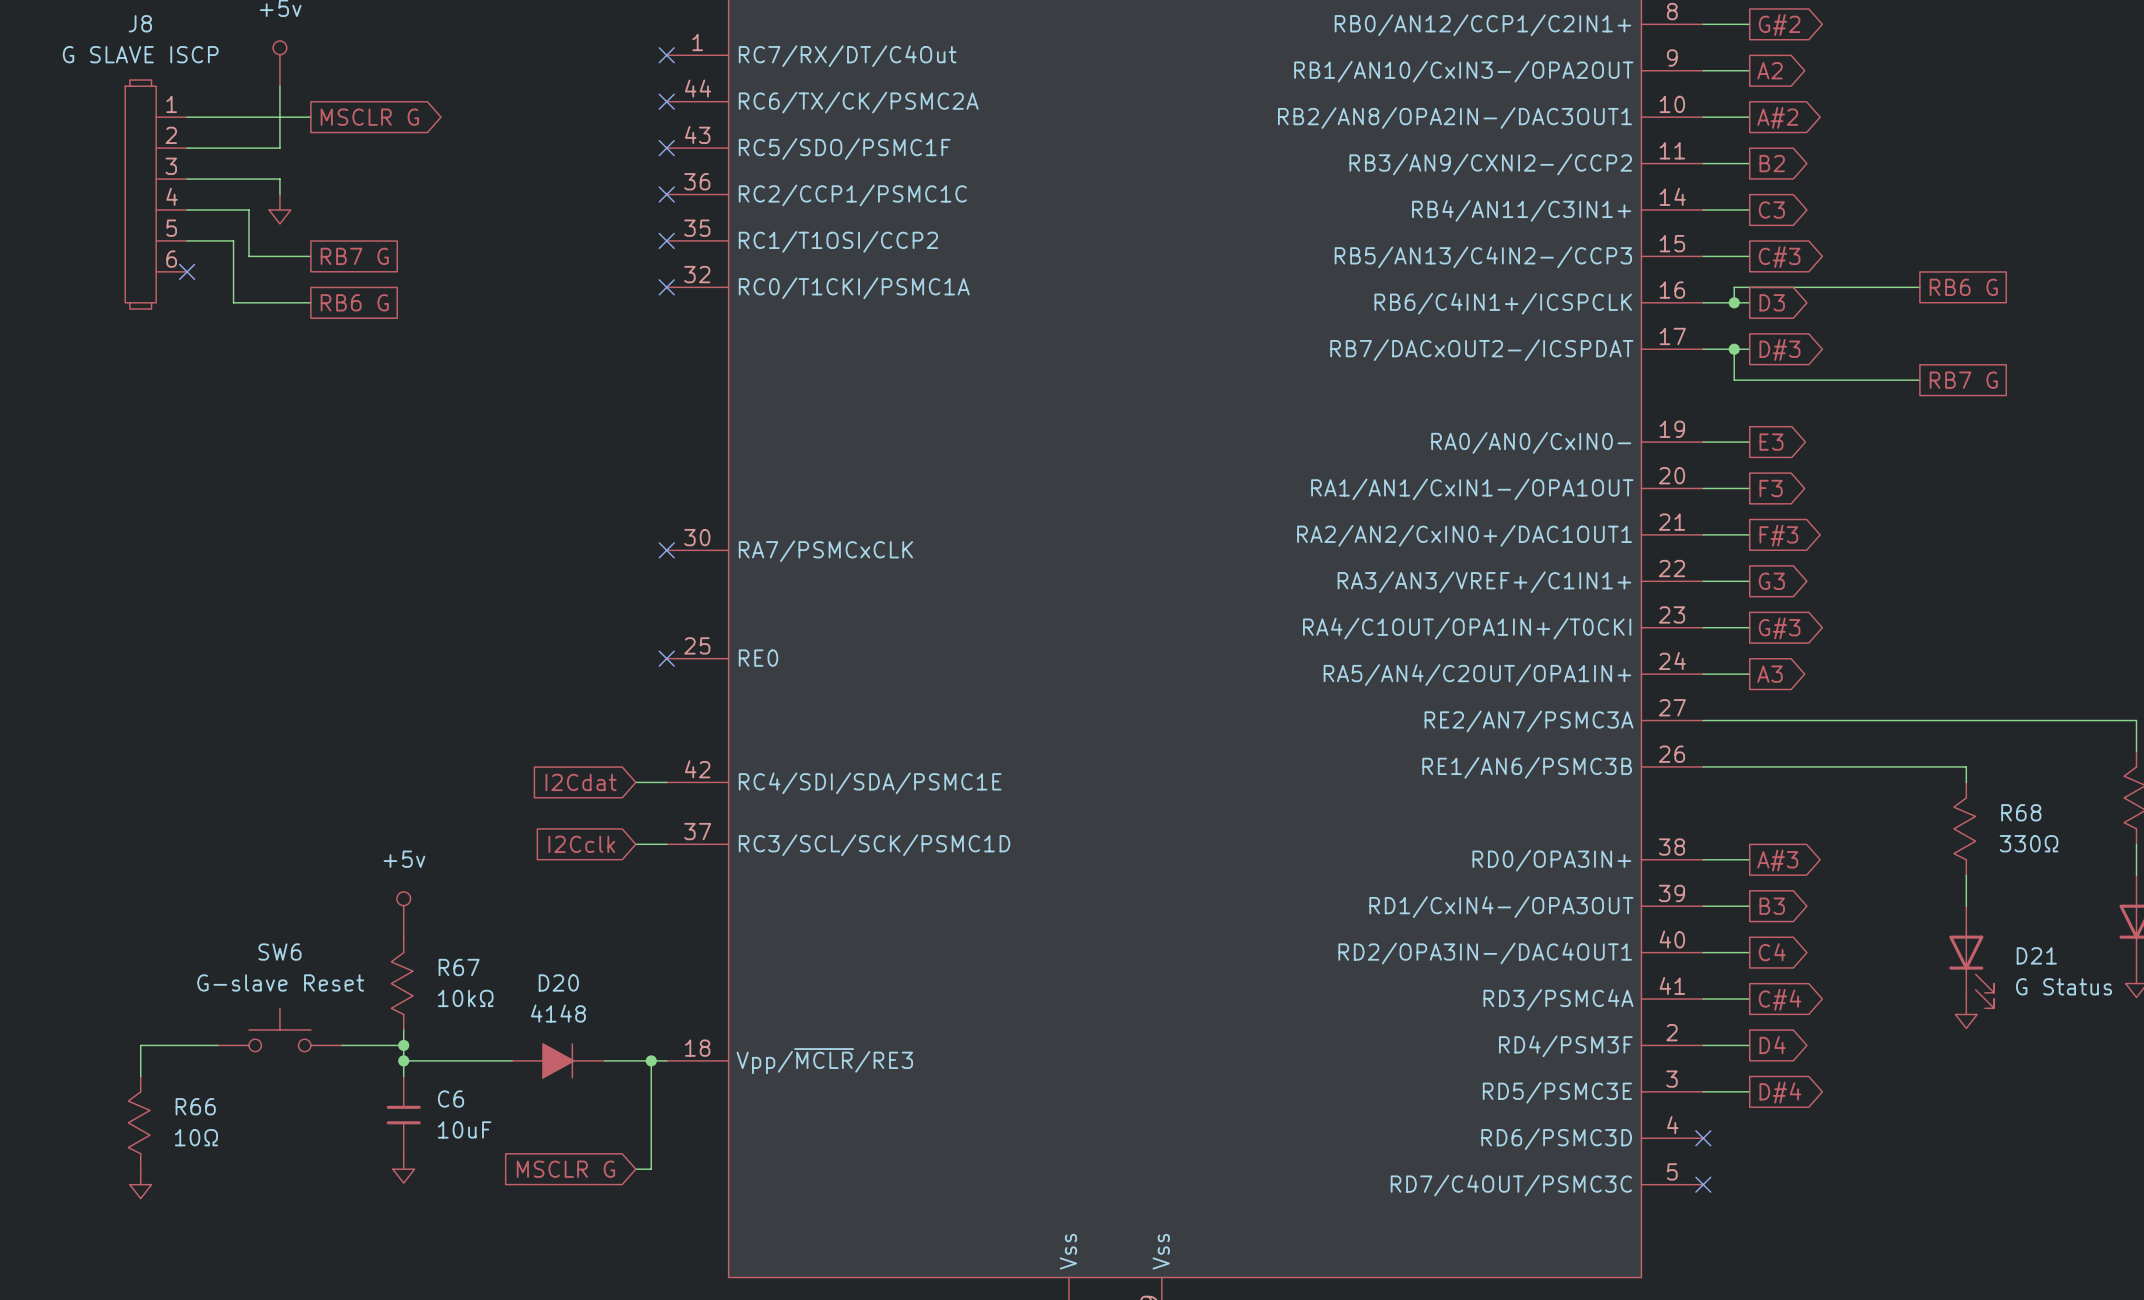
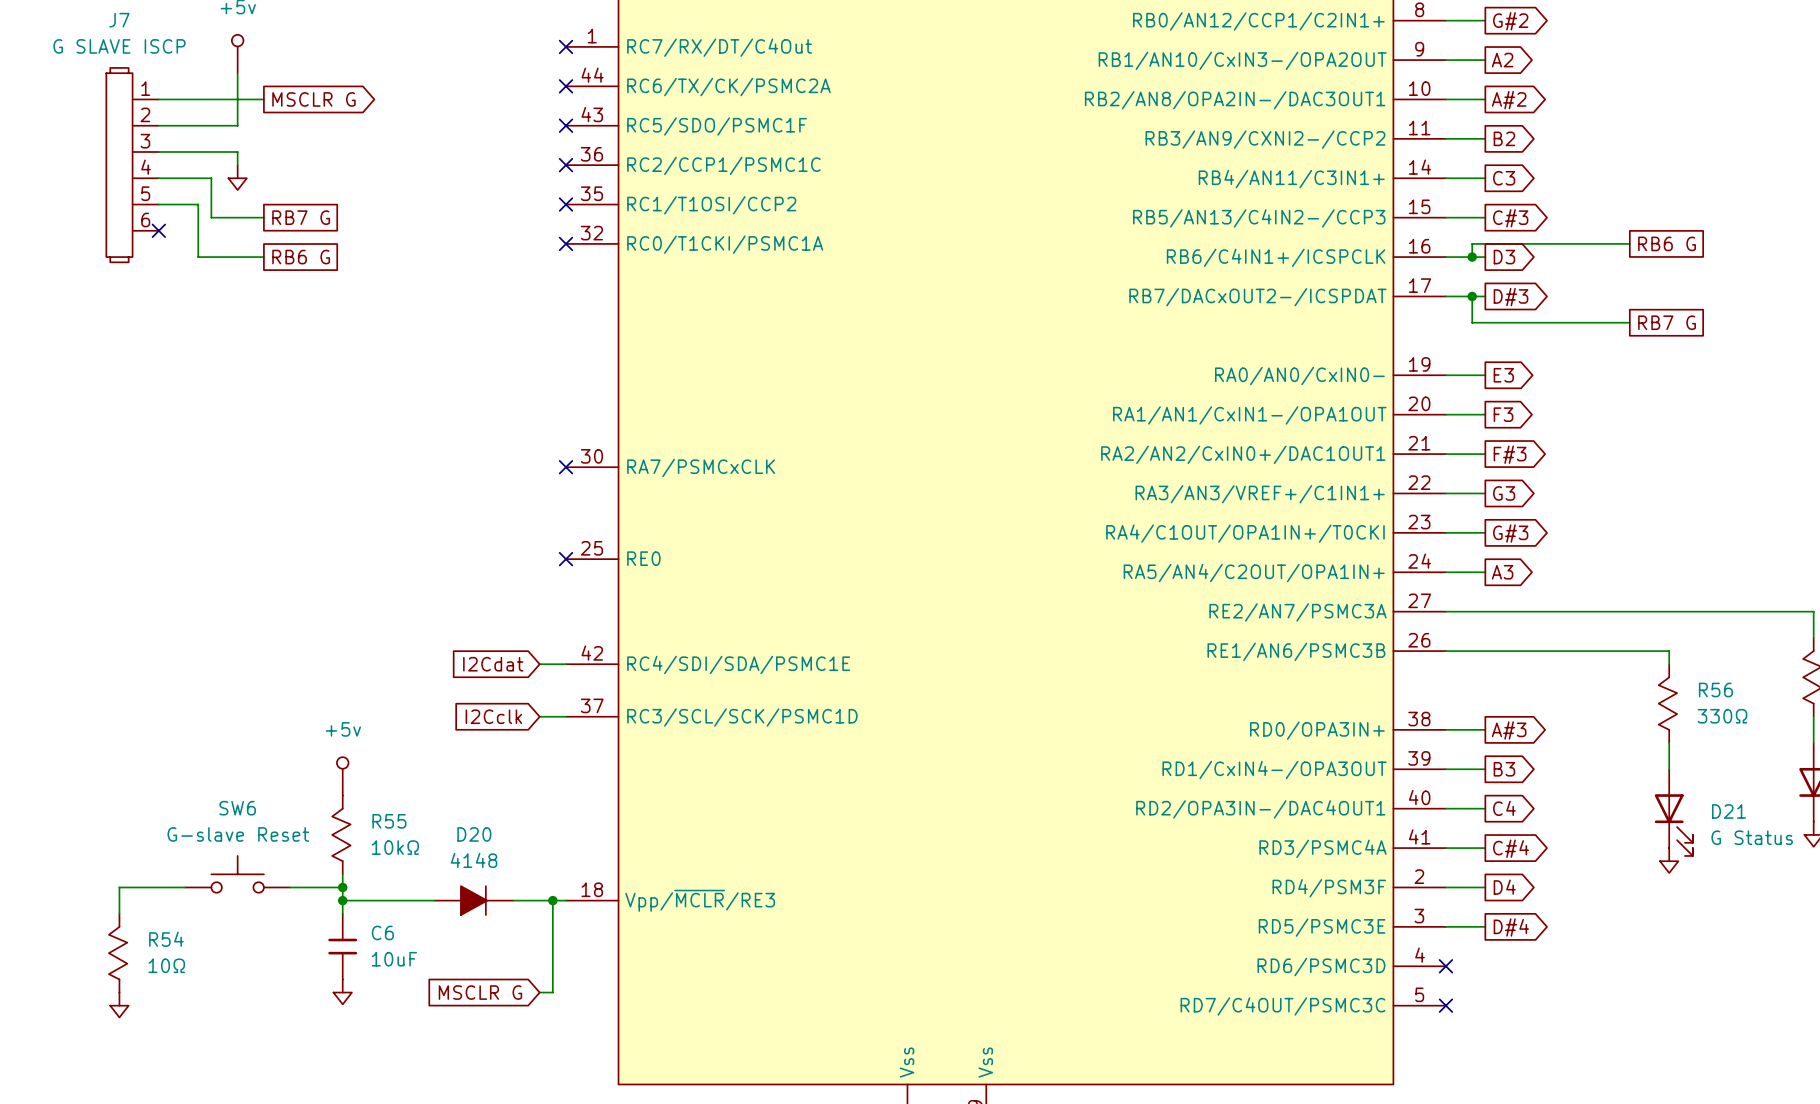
J8 name: J8 (140, 23) -> J7 (119, 20)
R68 name: R68 (2021, 812) -> R56 (1715, 689)
R67 name: R67 (459, 967) -> R55 (389, 821)
R66 name: R66 (195, 1106) -> R54 (166, 939)

